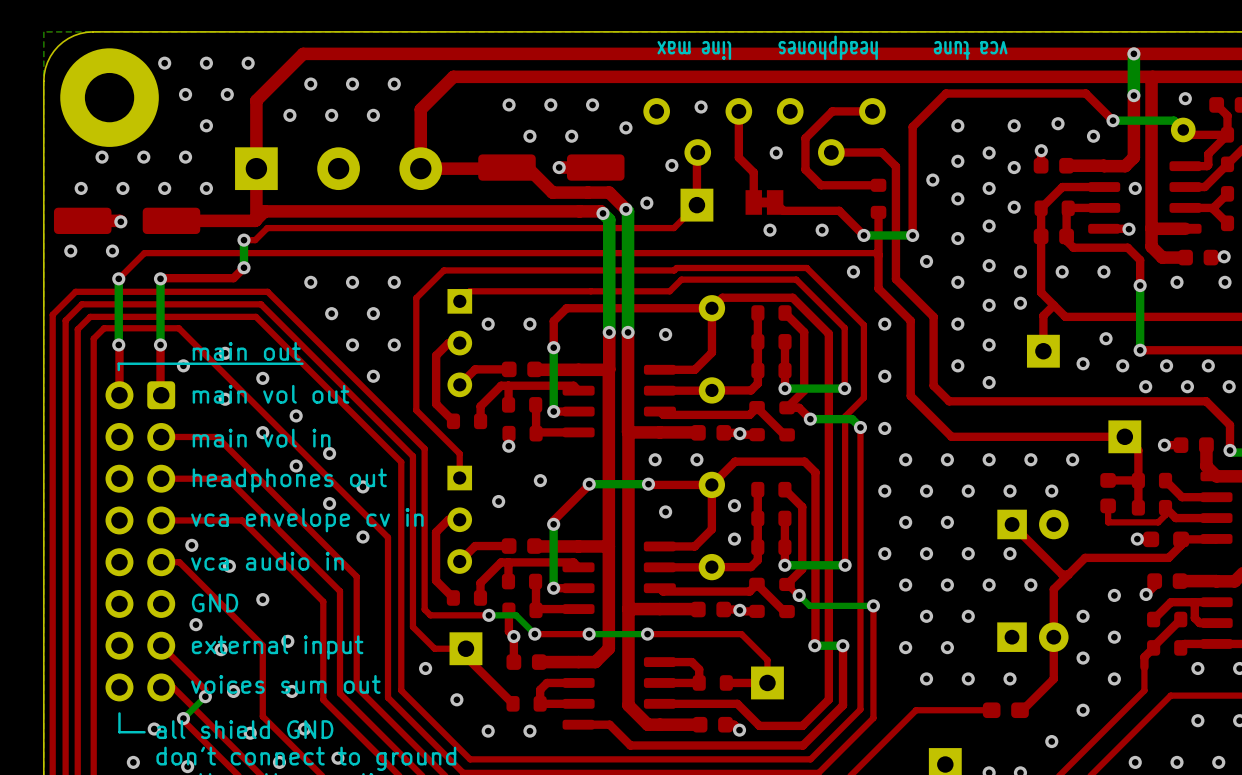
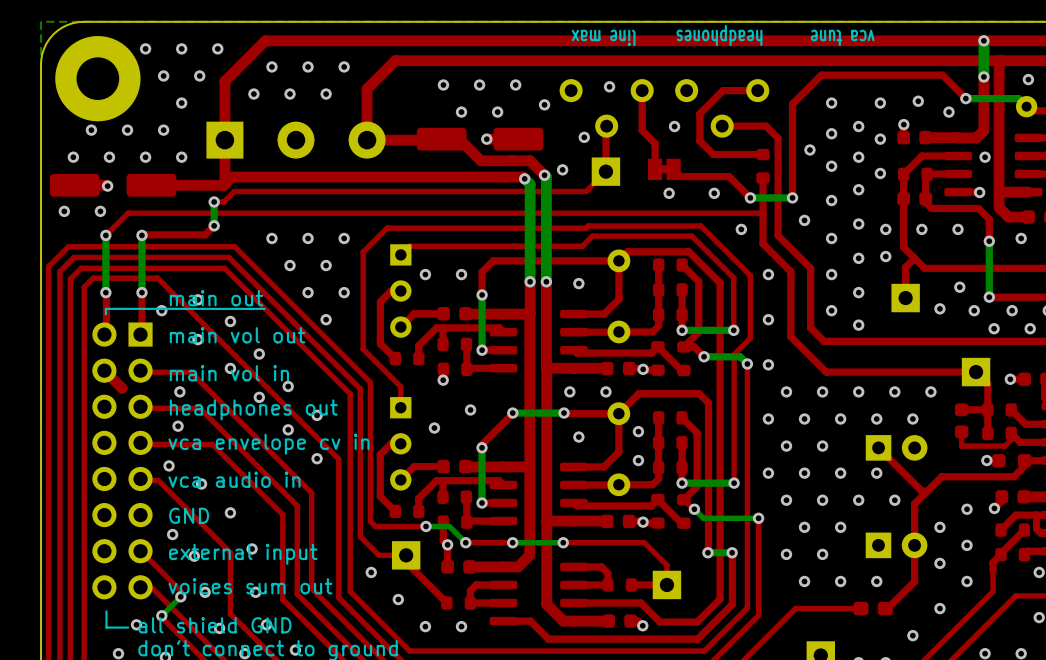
part footprint: [105, 381, 176, 702] -> [92, 322, 153, 600]
top track: none -> (104, 370) (122, 388)
via: none -> (179, 391)
via: none -> (178, 426)

